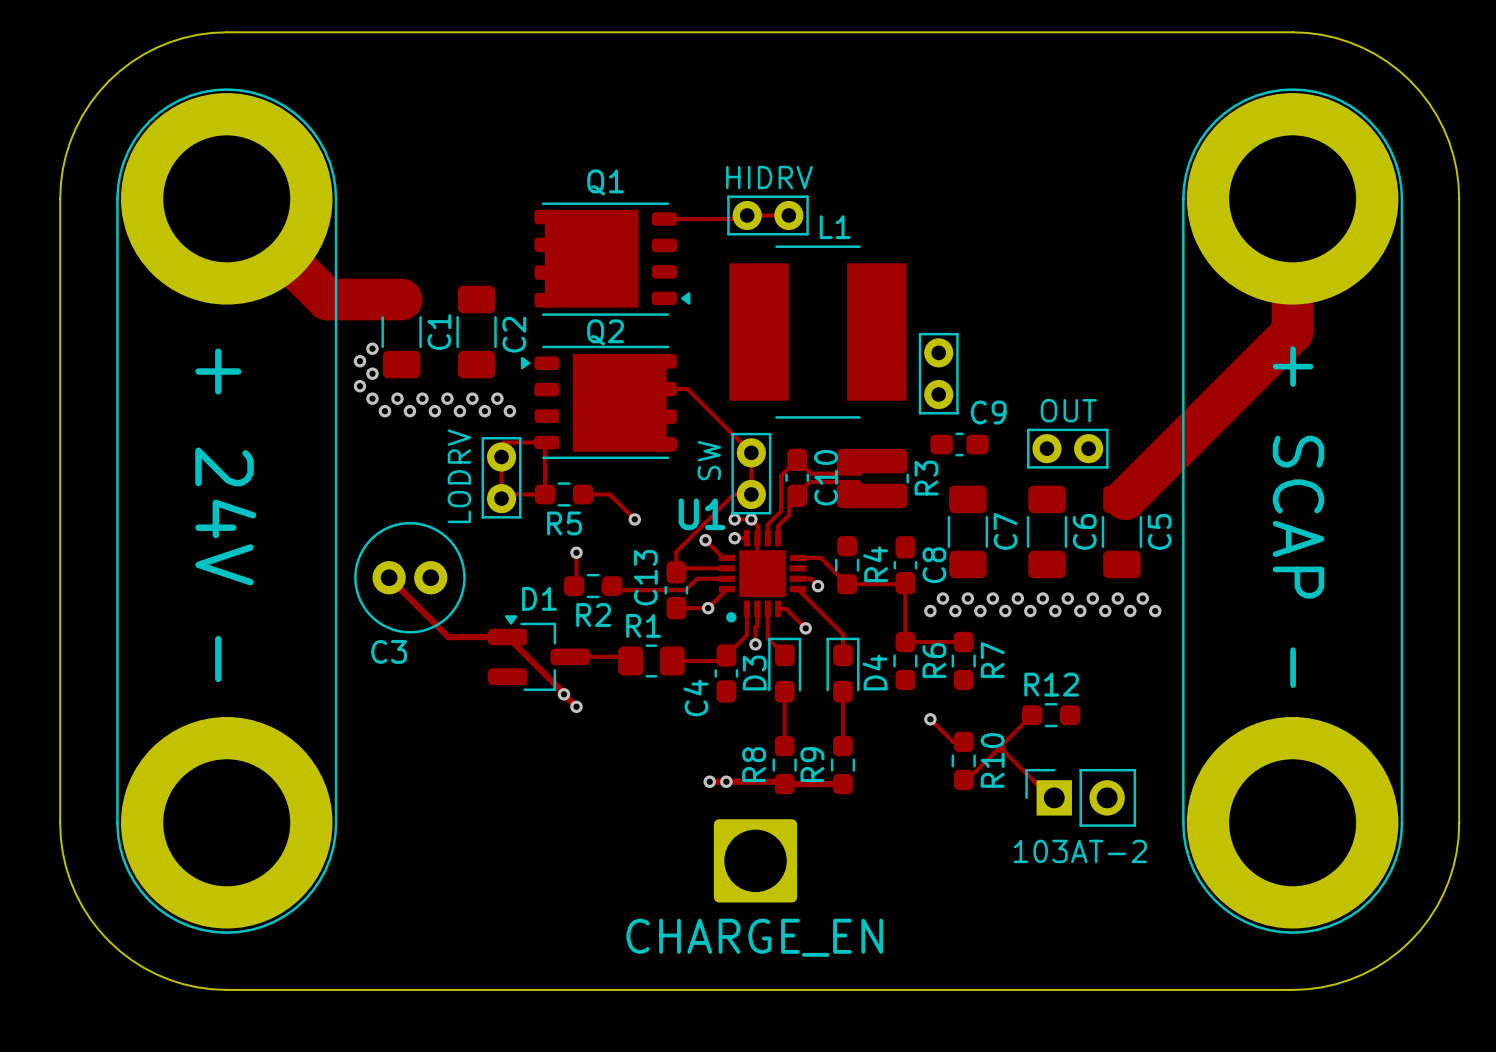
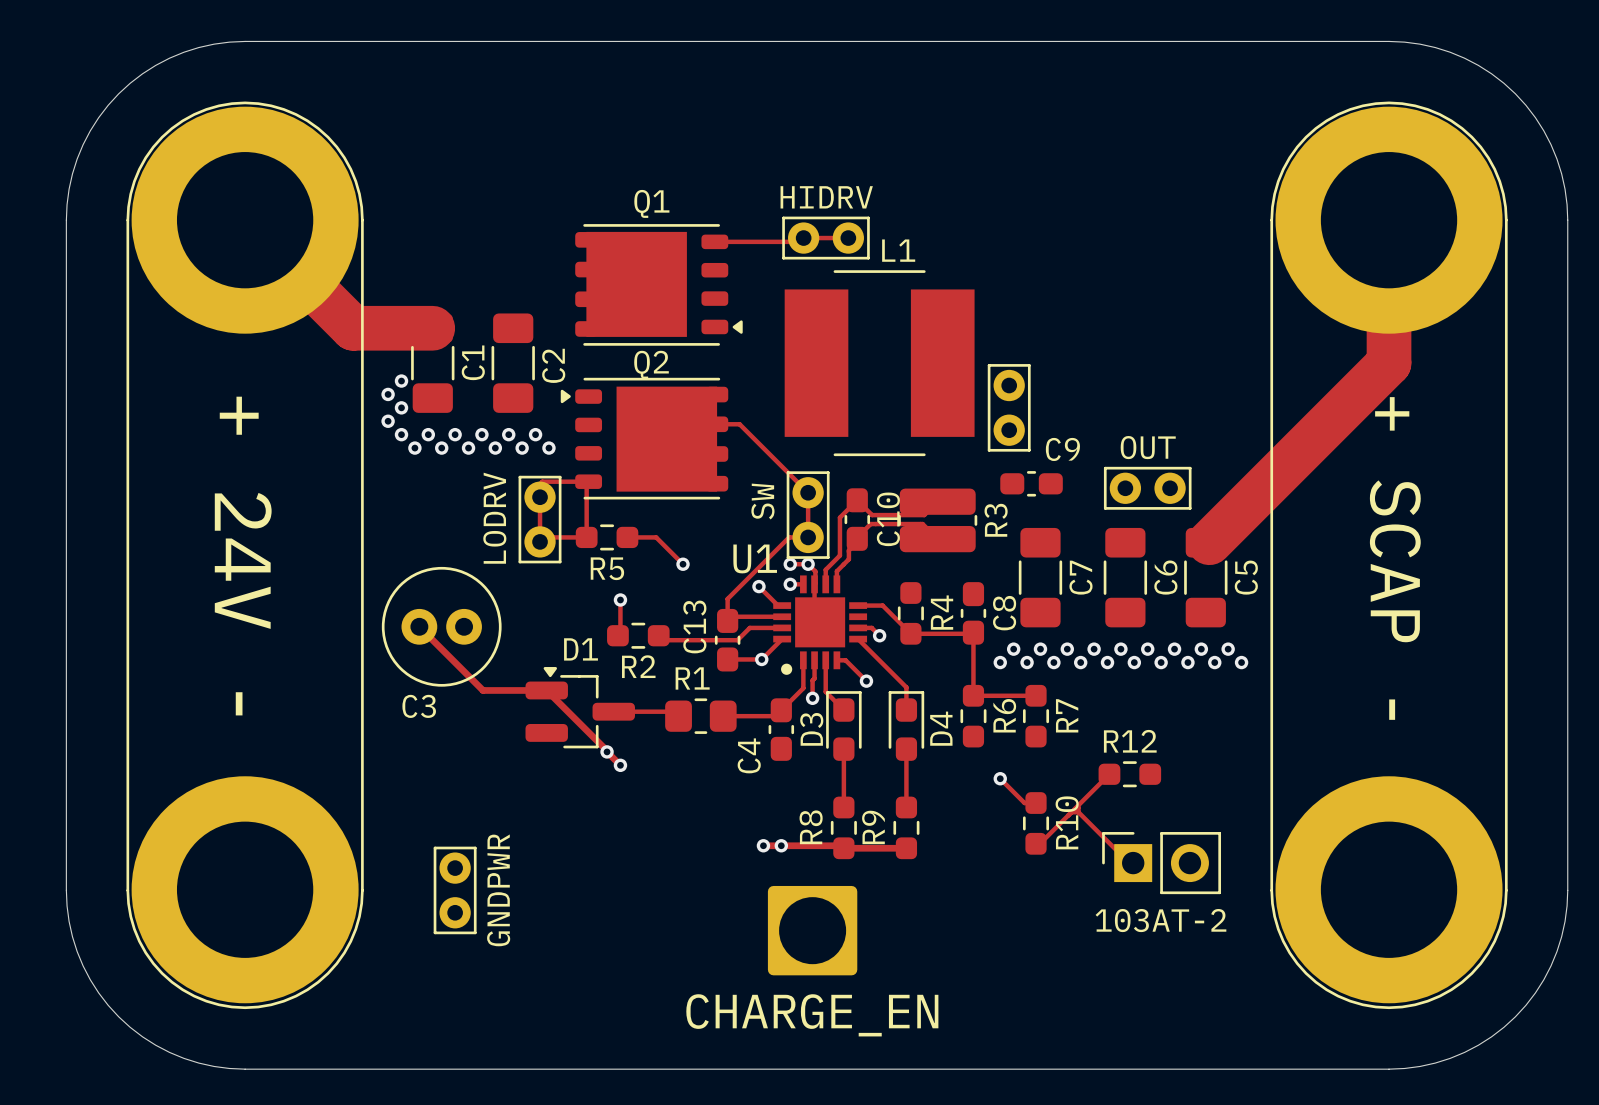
part: none -> (455, 890)
text: none -> GNDPWR (498, 890)

